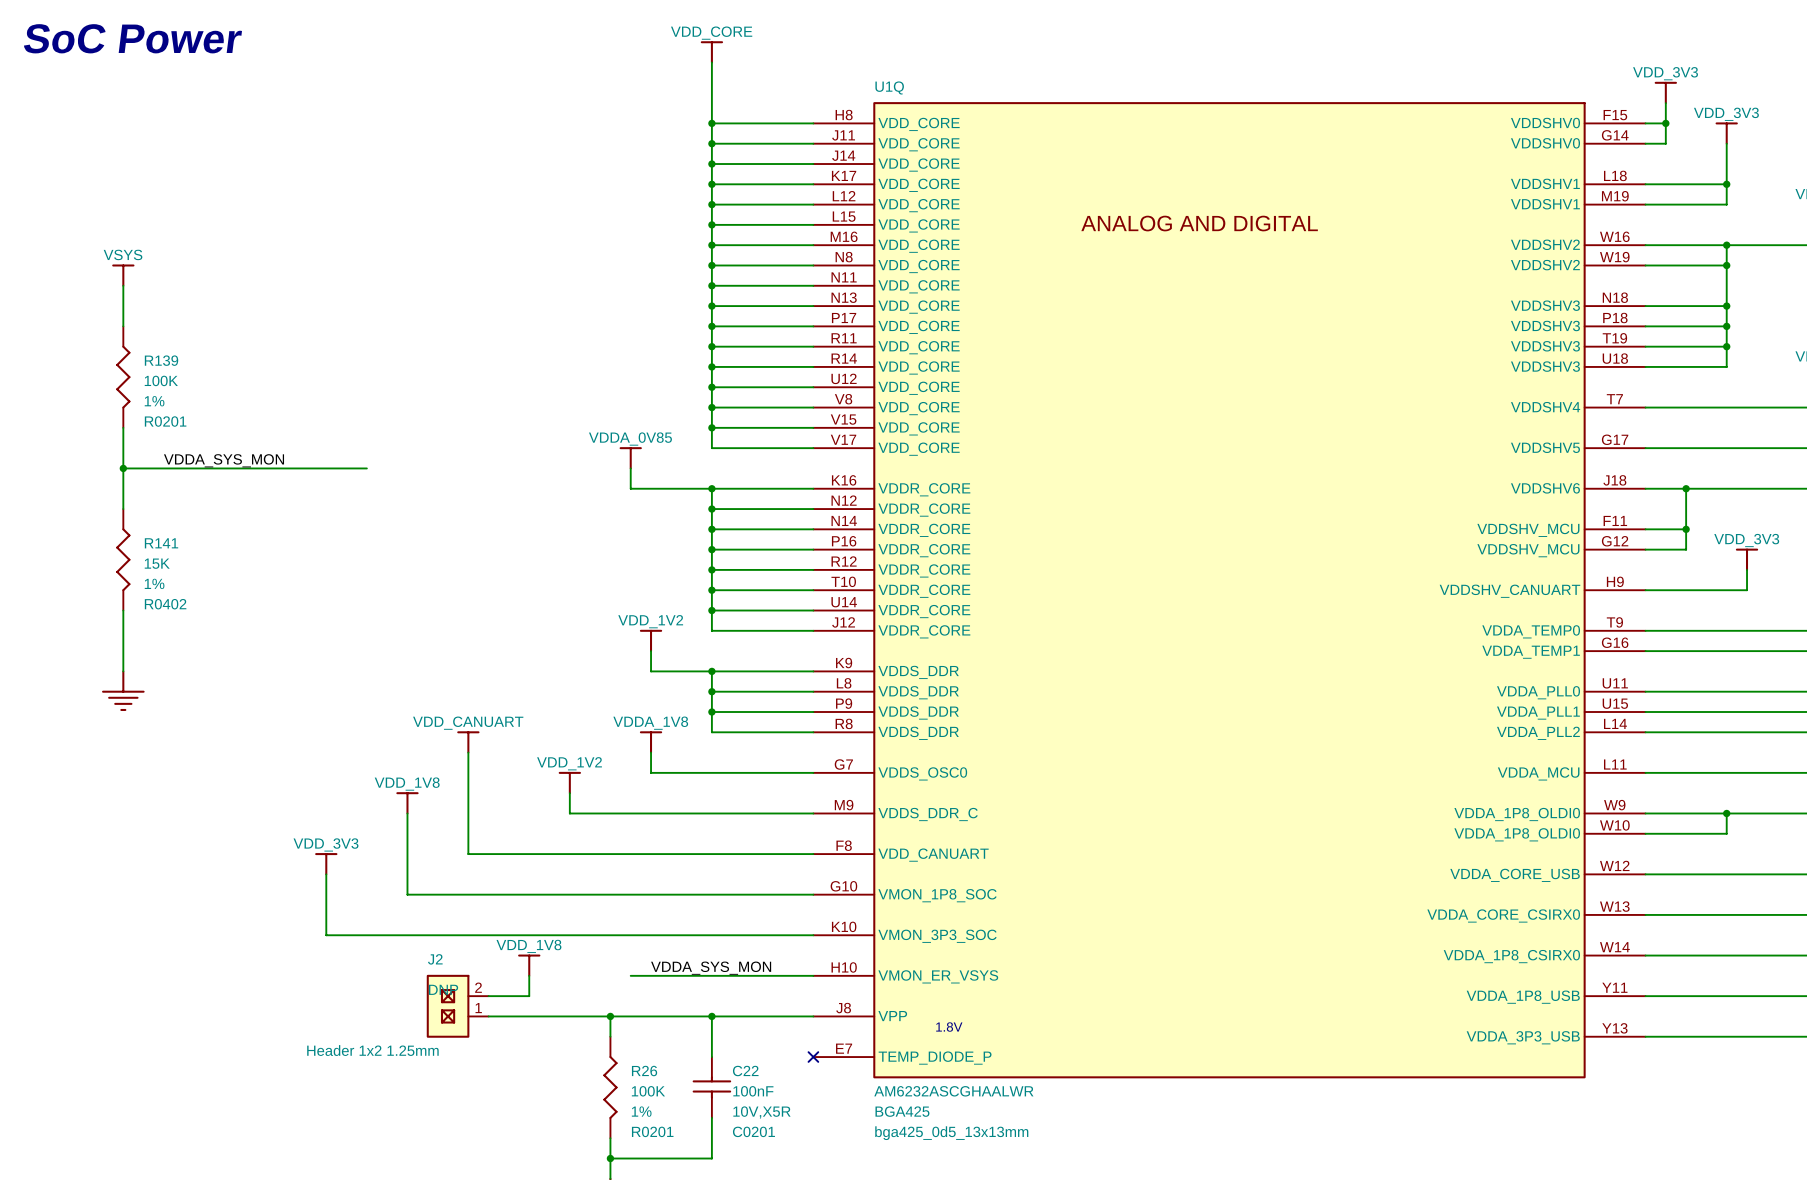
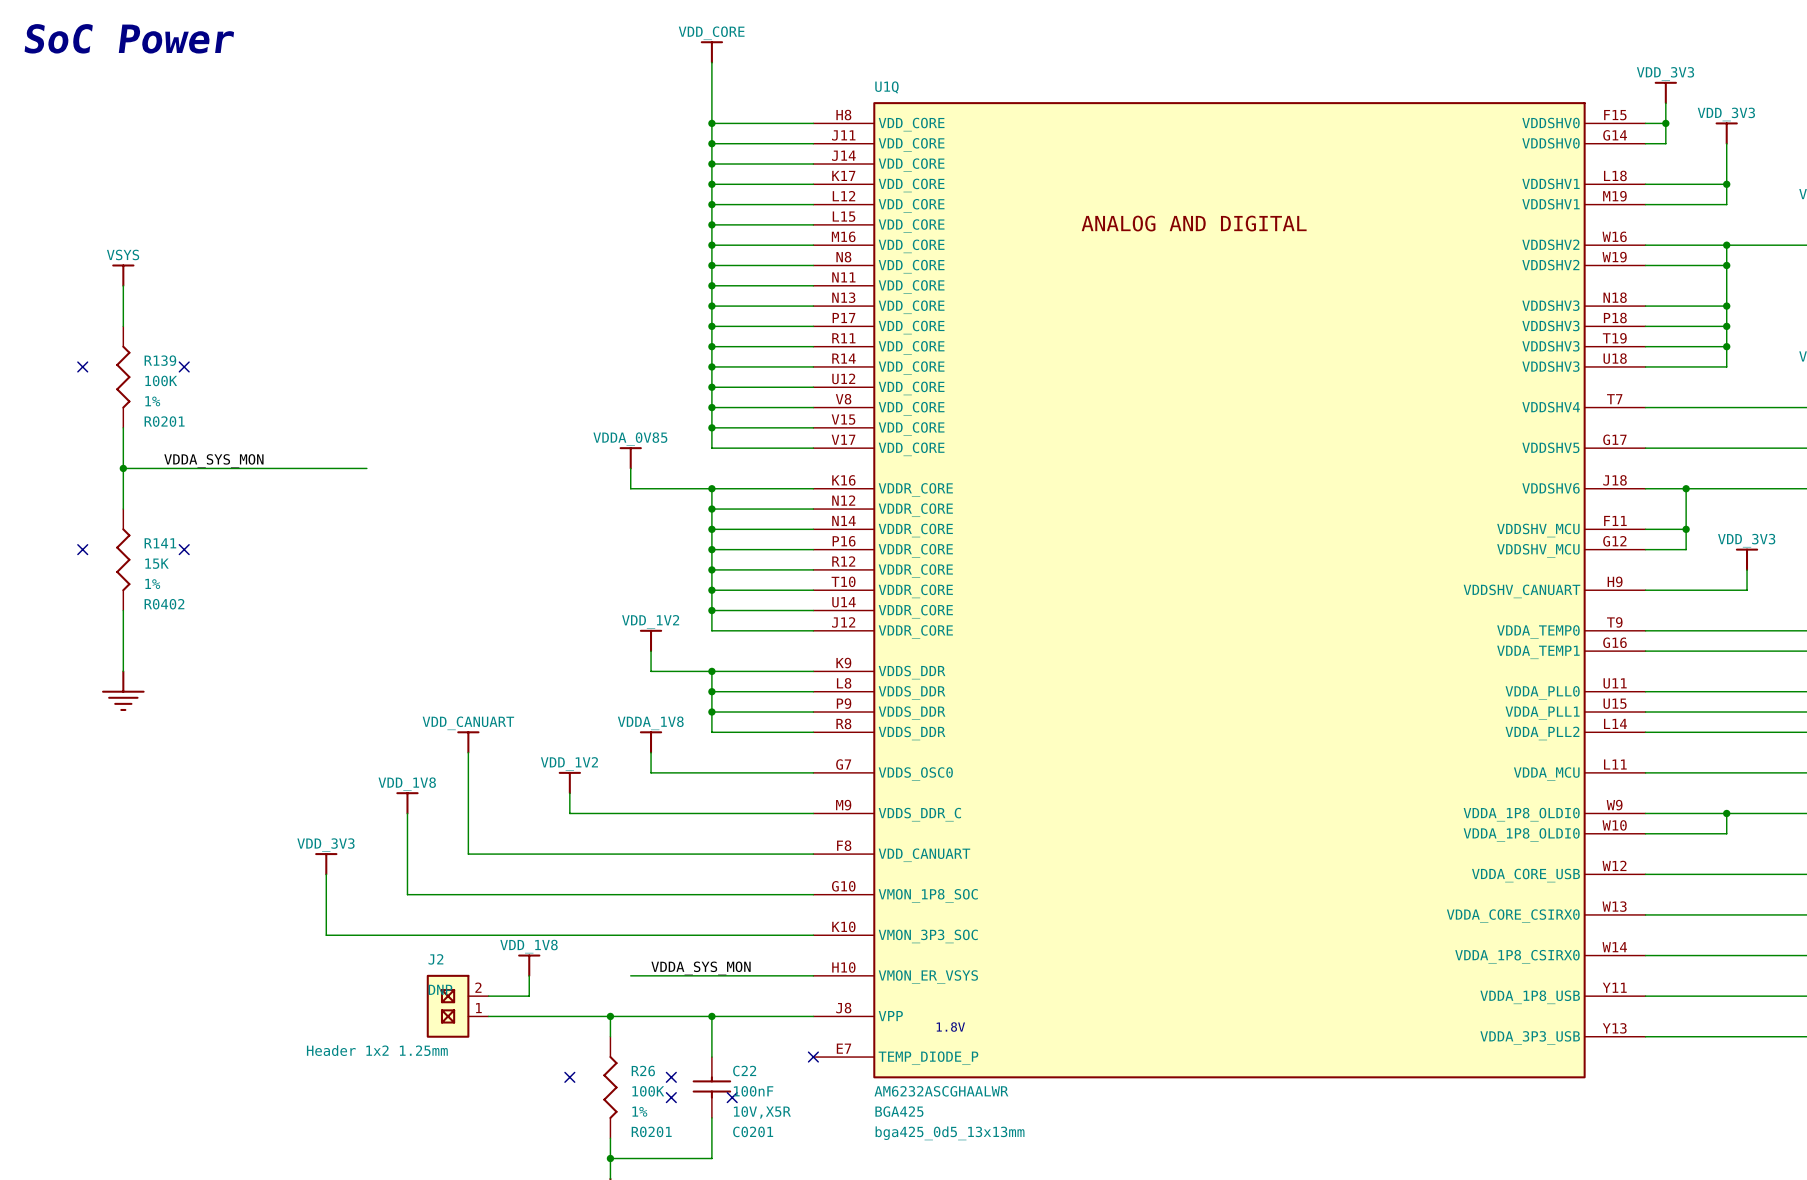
no-connect mark: none -> (82, 366)
no-connect mark: none -> (184, 366)
no-connect mark: none -> (82, 549)
no-connect mark: none -> (184, 549)
no-connect mark: none -> (569, 1077)
no-connect mark: none -> (671, 1077)
no-connect mark: none -> (671, 1097)
no-connect mark: none -> (732, 1097)

